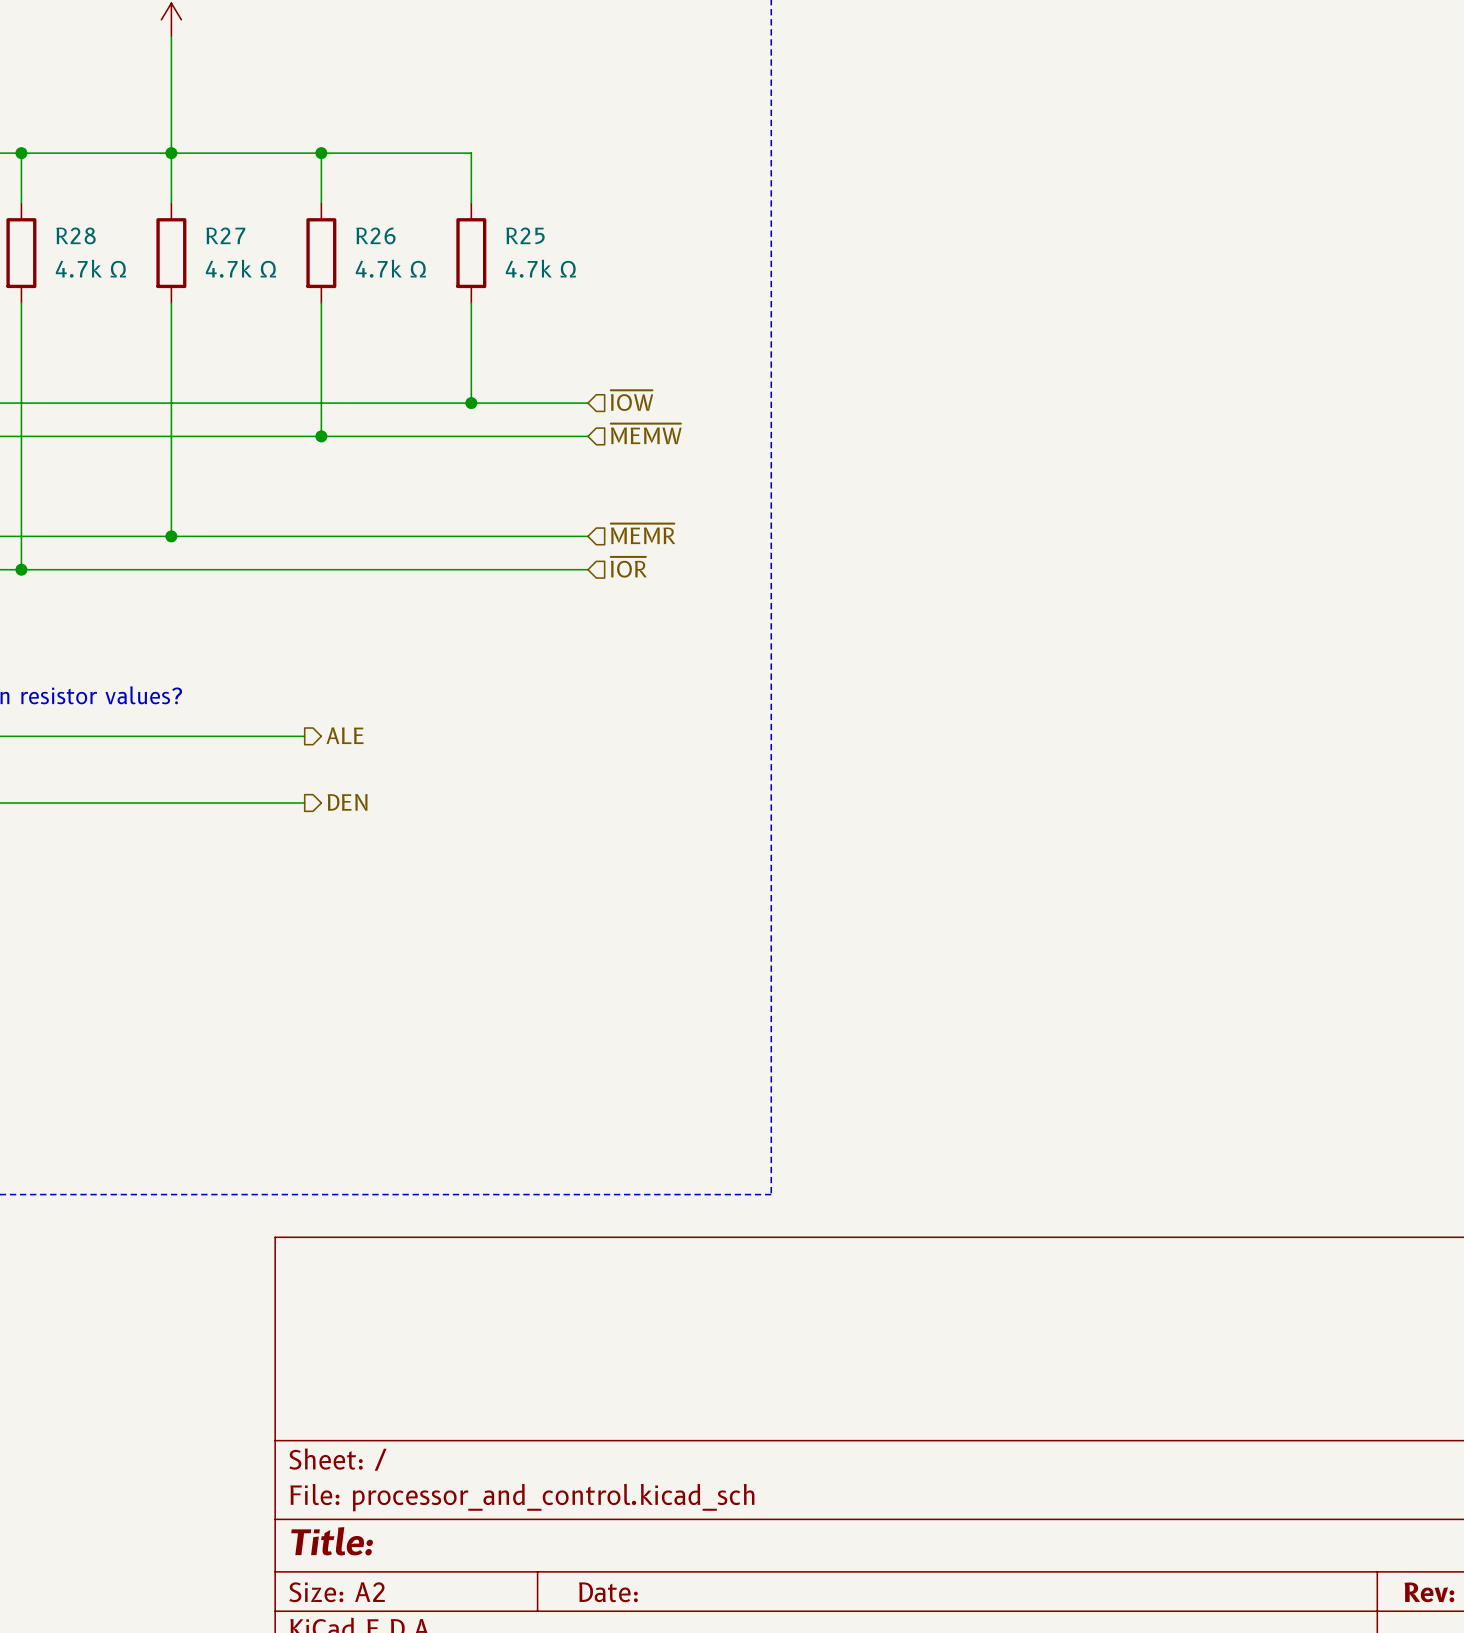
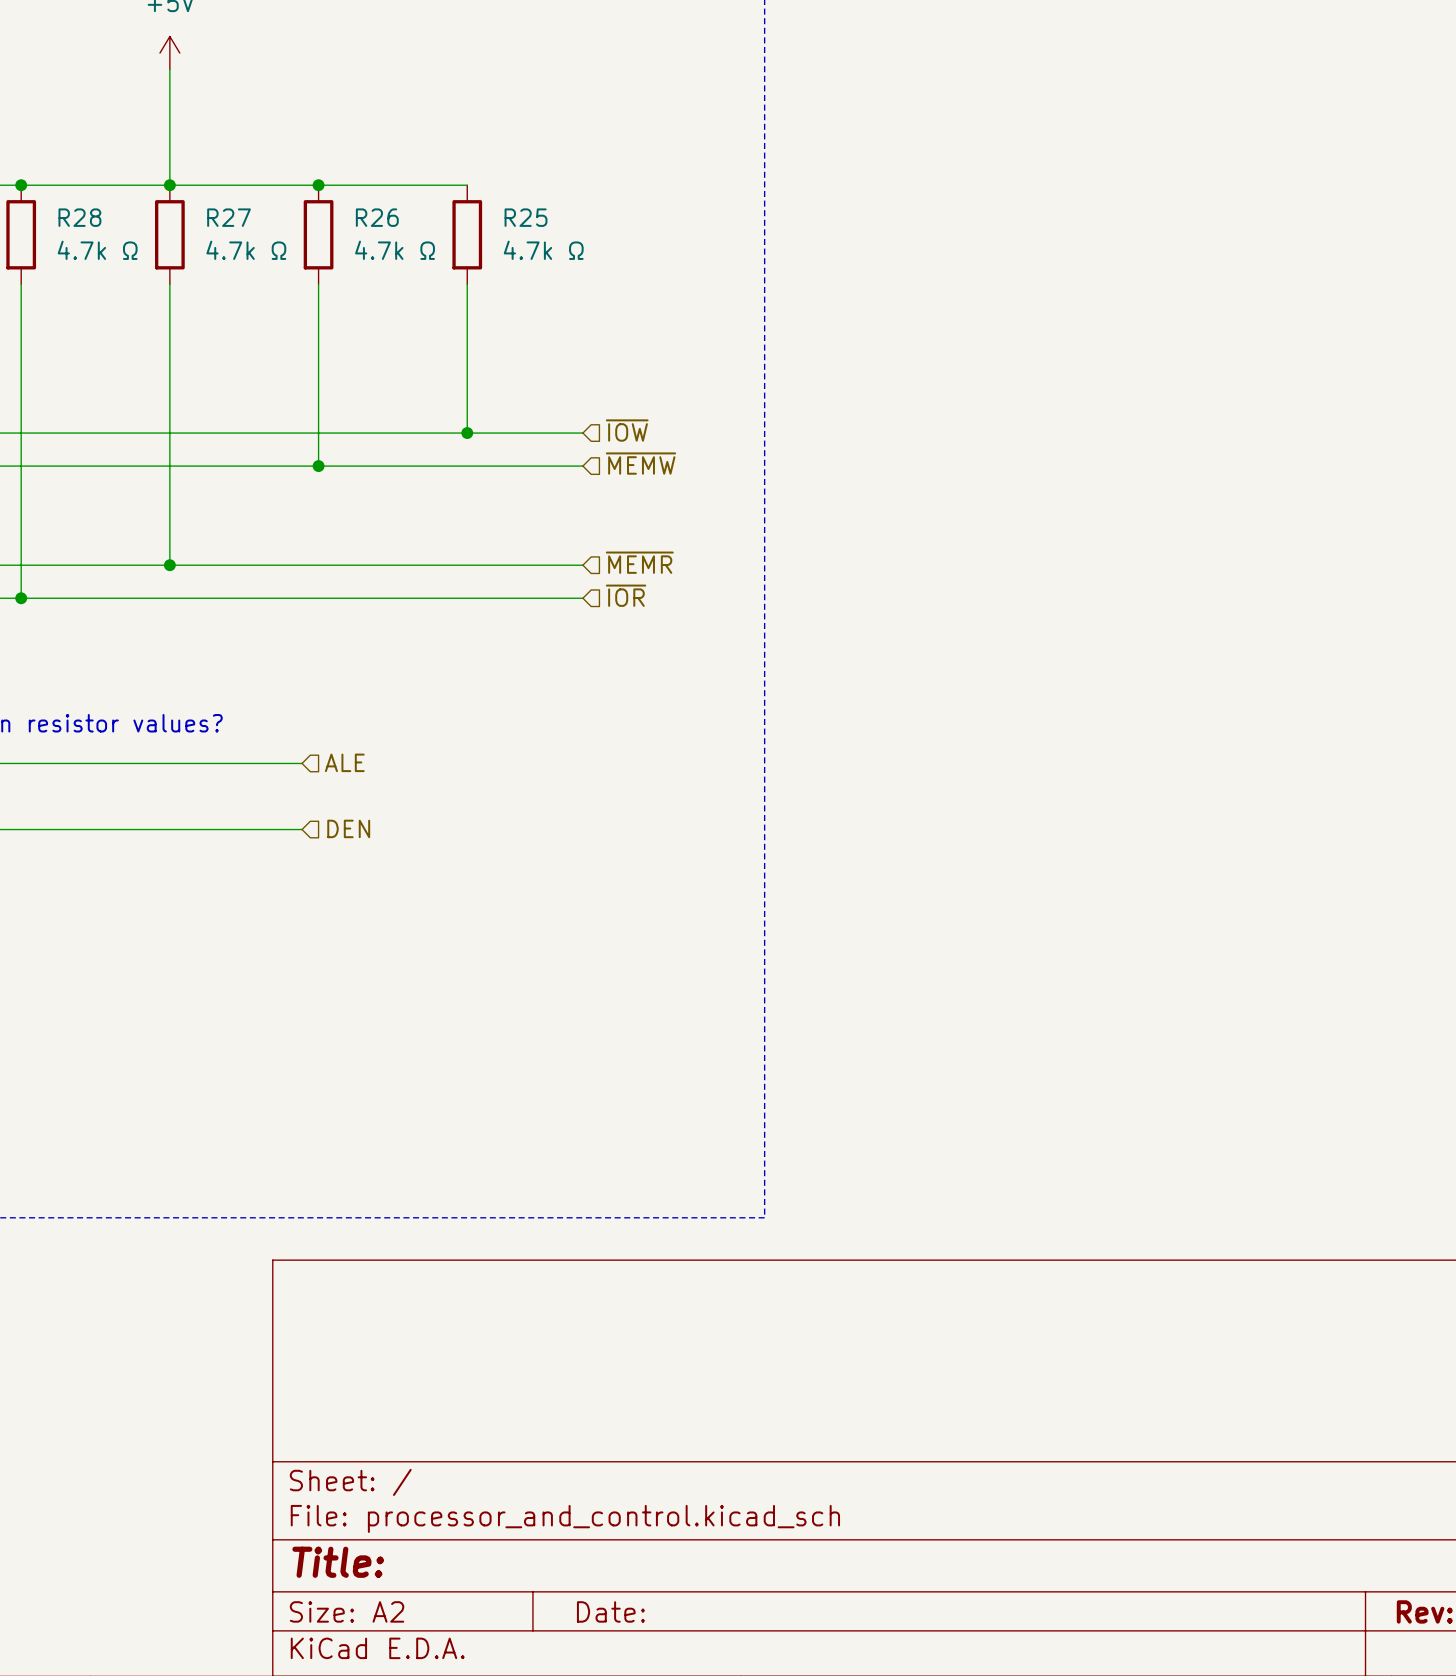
wire: (21, 153) (21, 203) -> (21, 284) (21, 333)
wire: (171, 153) (171, 203) -> (169, 284) (169, 333)
wire: (321, 153) (321, 203) -> (318, 284) (318, 333)
wire: (471, 153) (471, 203) -> (467, 284) (467, 333)
R28 position: (21, 253) -> (21, 234)
R27 position: (171, 253) -> (169, 234)
R26 position: (321, 253) -> (318, 234)
R25 position: (471, 253) -> (467, 234)
hierarchical label shape: output (345, 735) -> input (344, 762)
hierarchical label shape: output (347, 802) -> input (348, 828)

